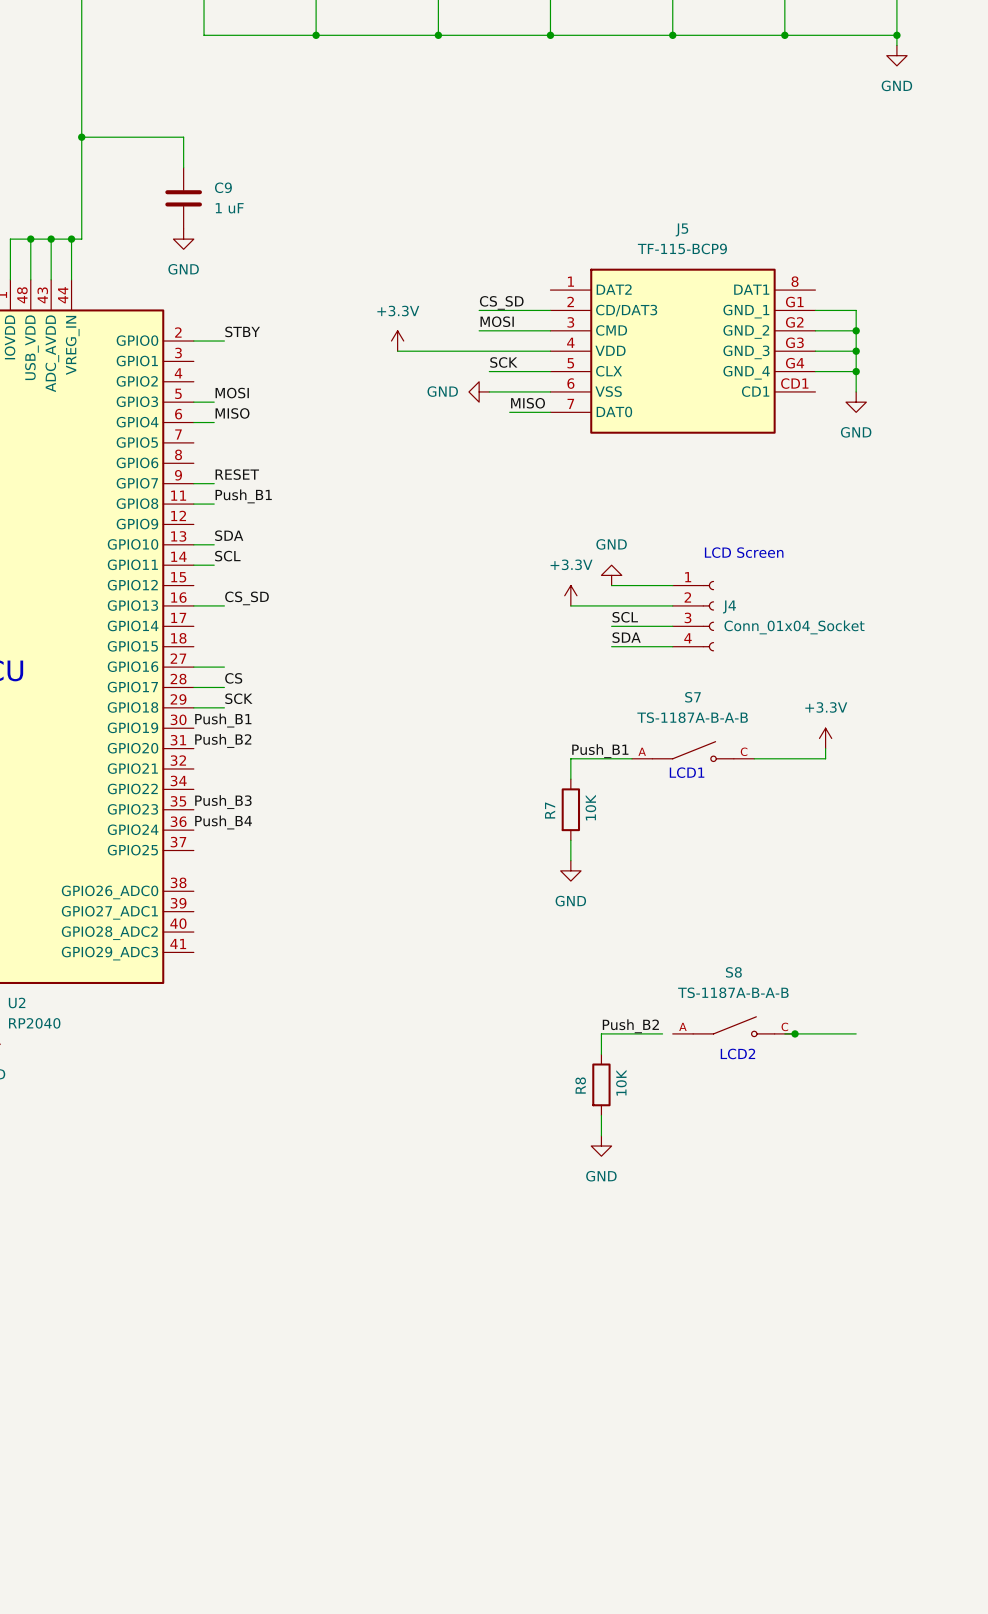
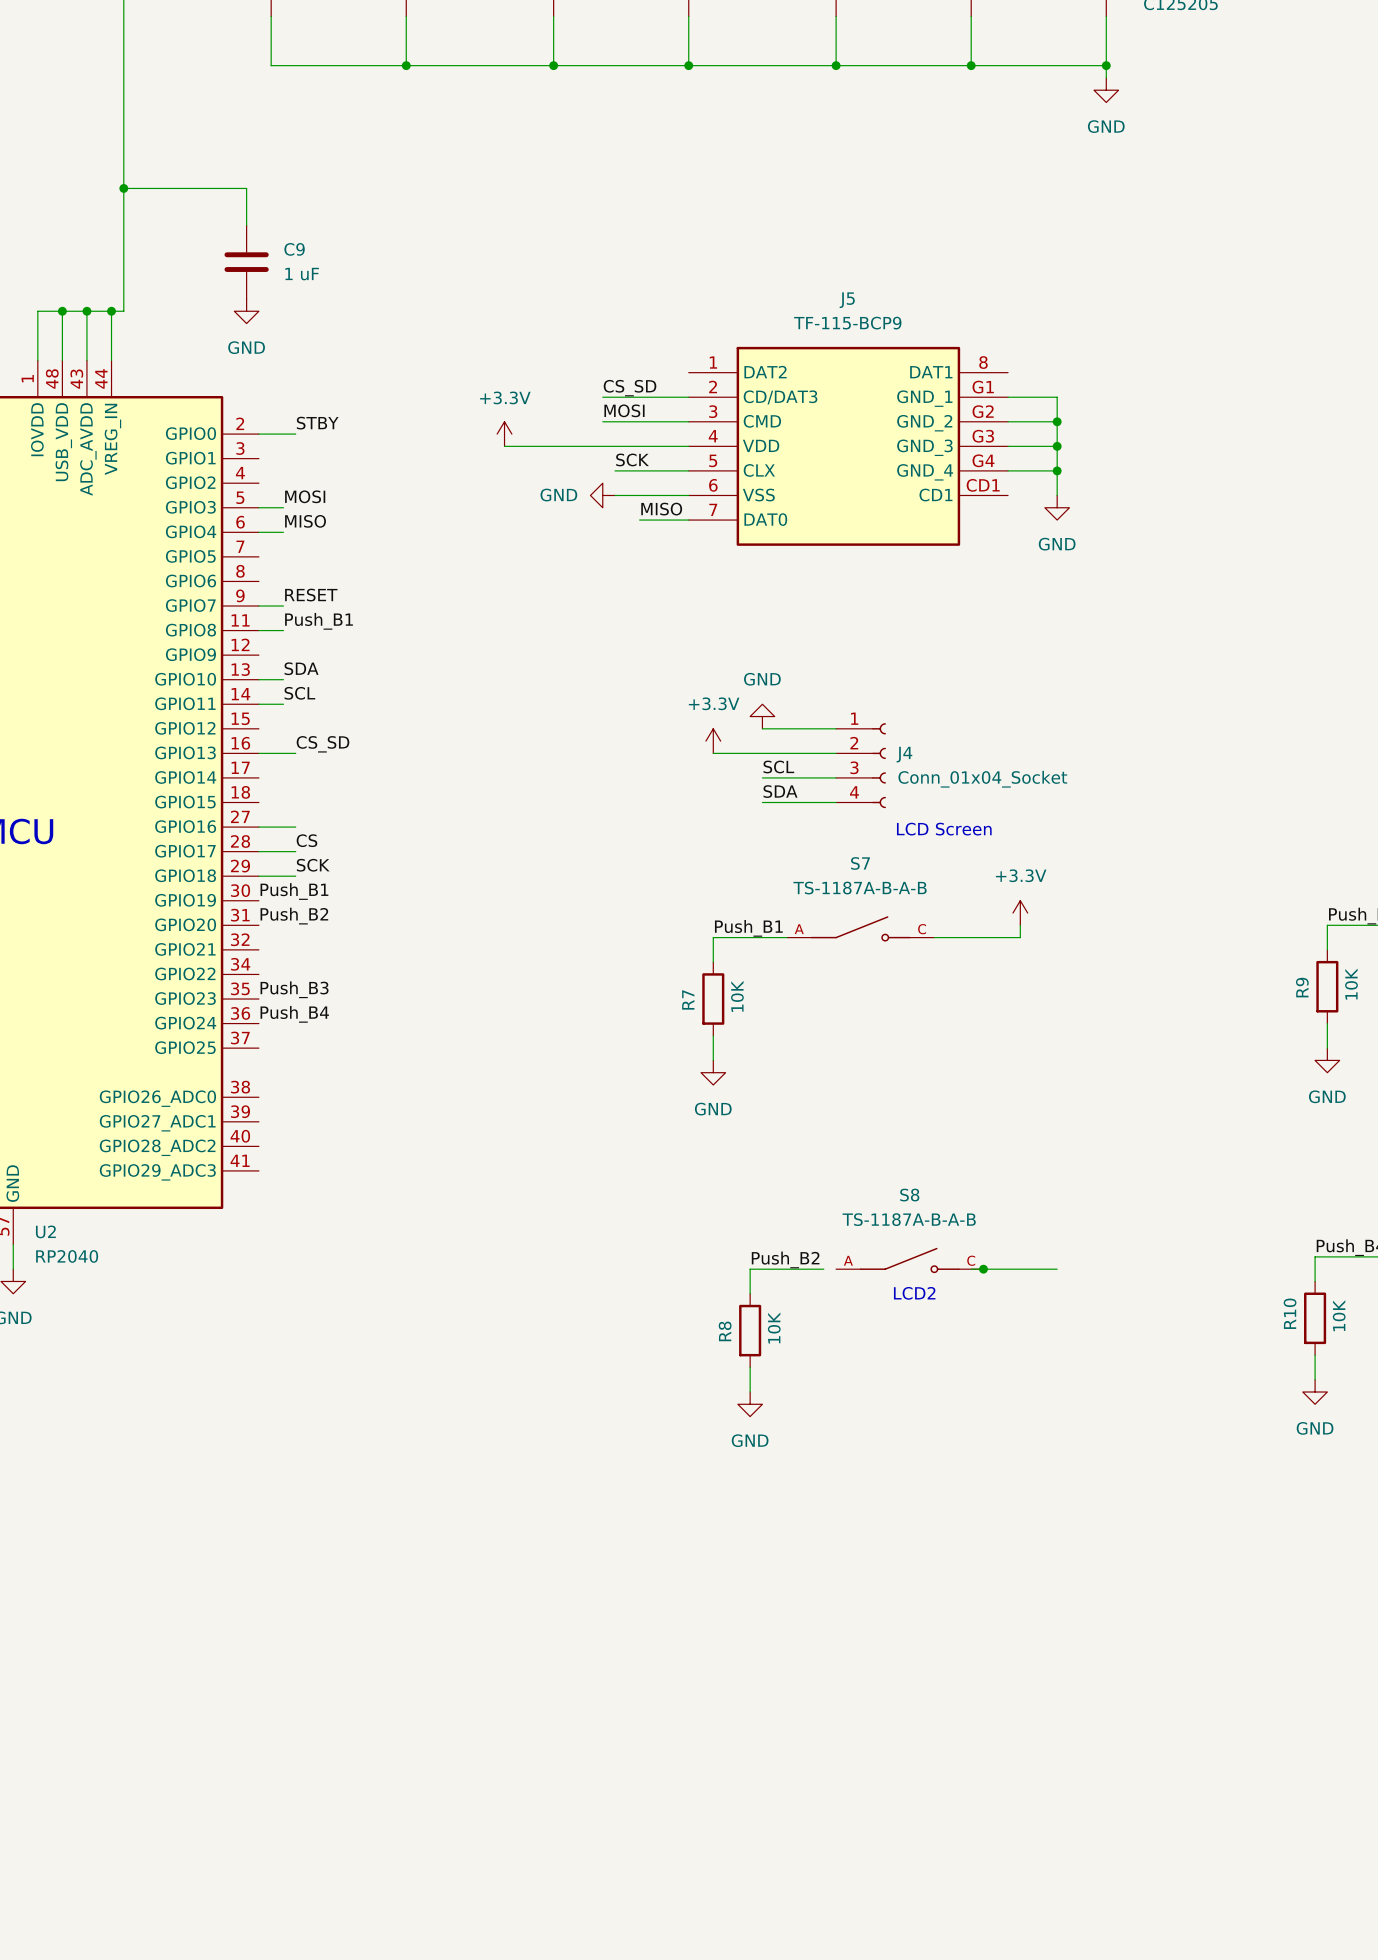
text position: LCD Screen (744, 552) -> LCD Screen (944, 829)
text: LCD1 (687, 772) -> none

